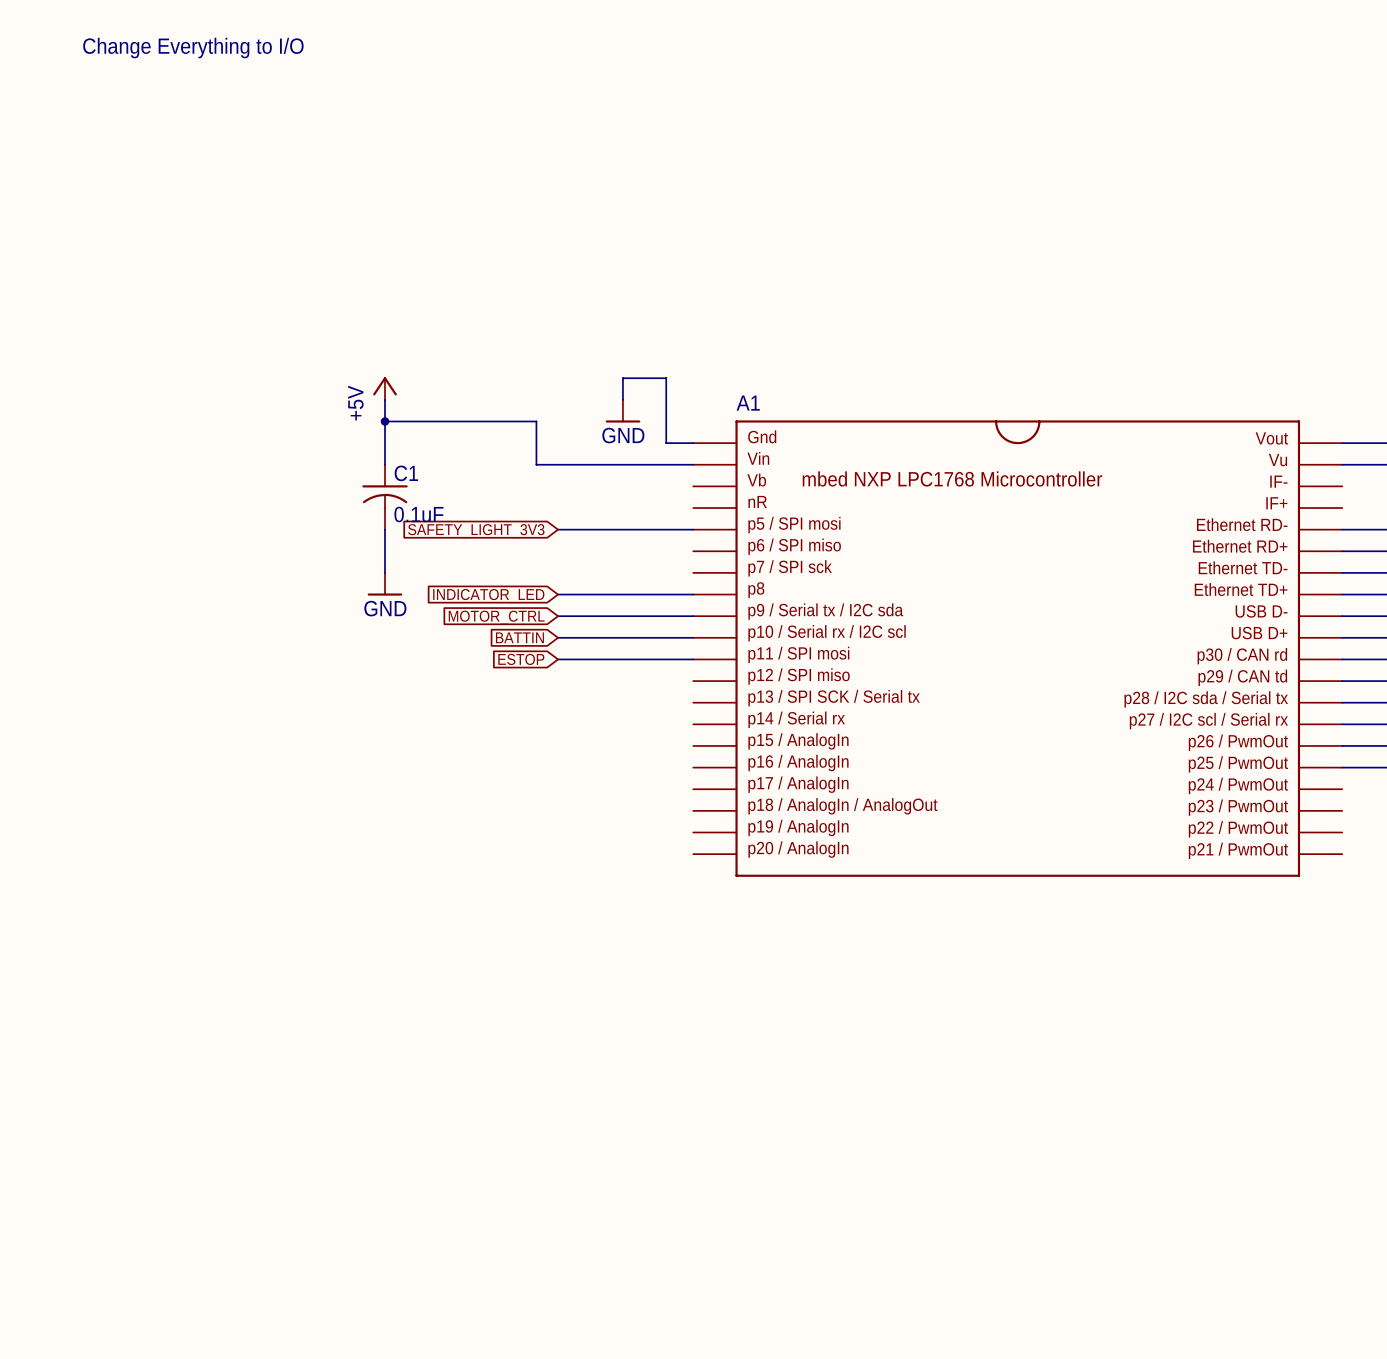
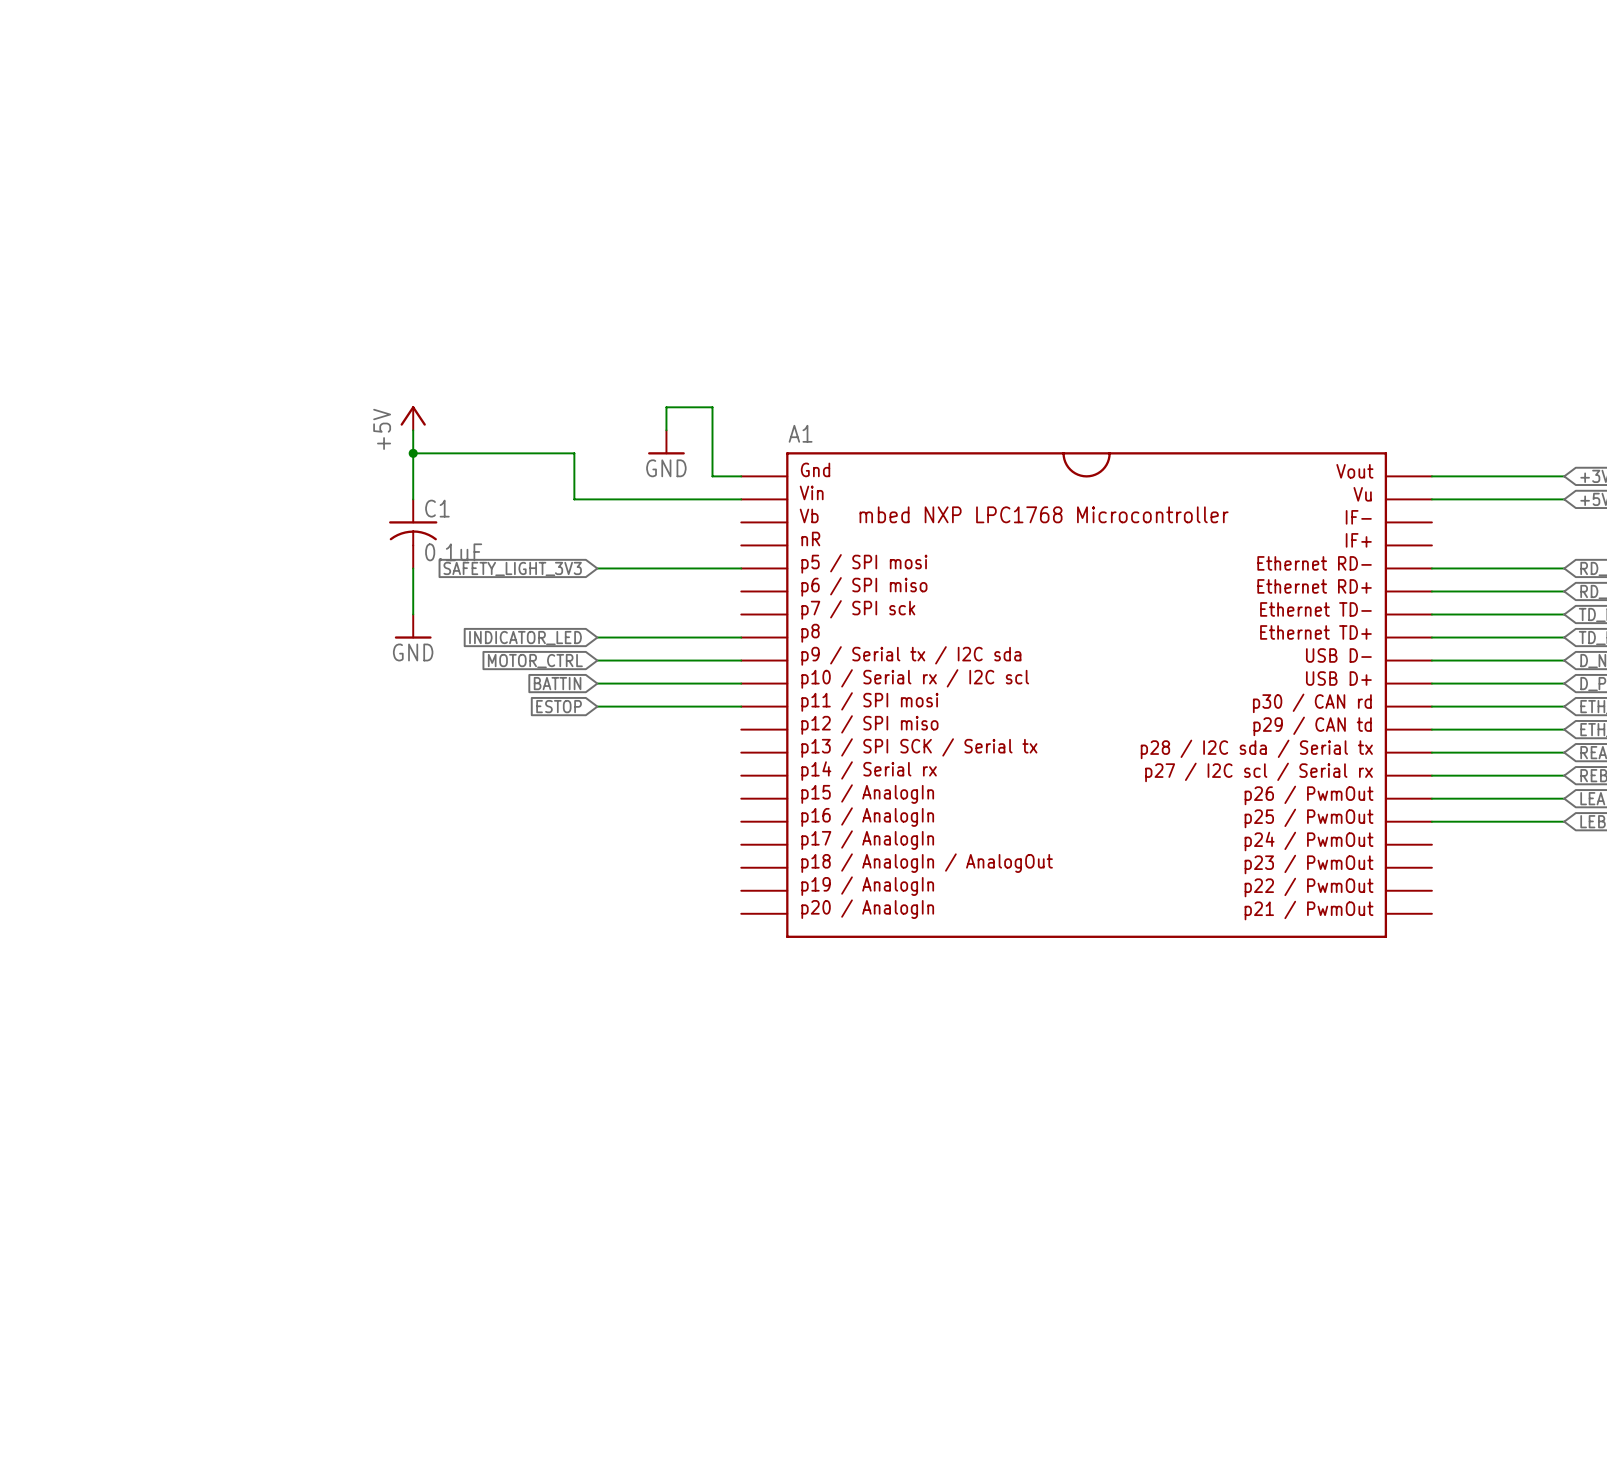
text: Change Everything to I/O (193, 48) -> none

